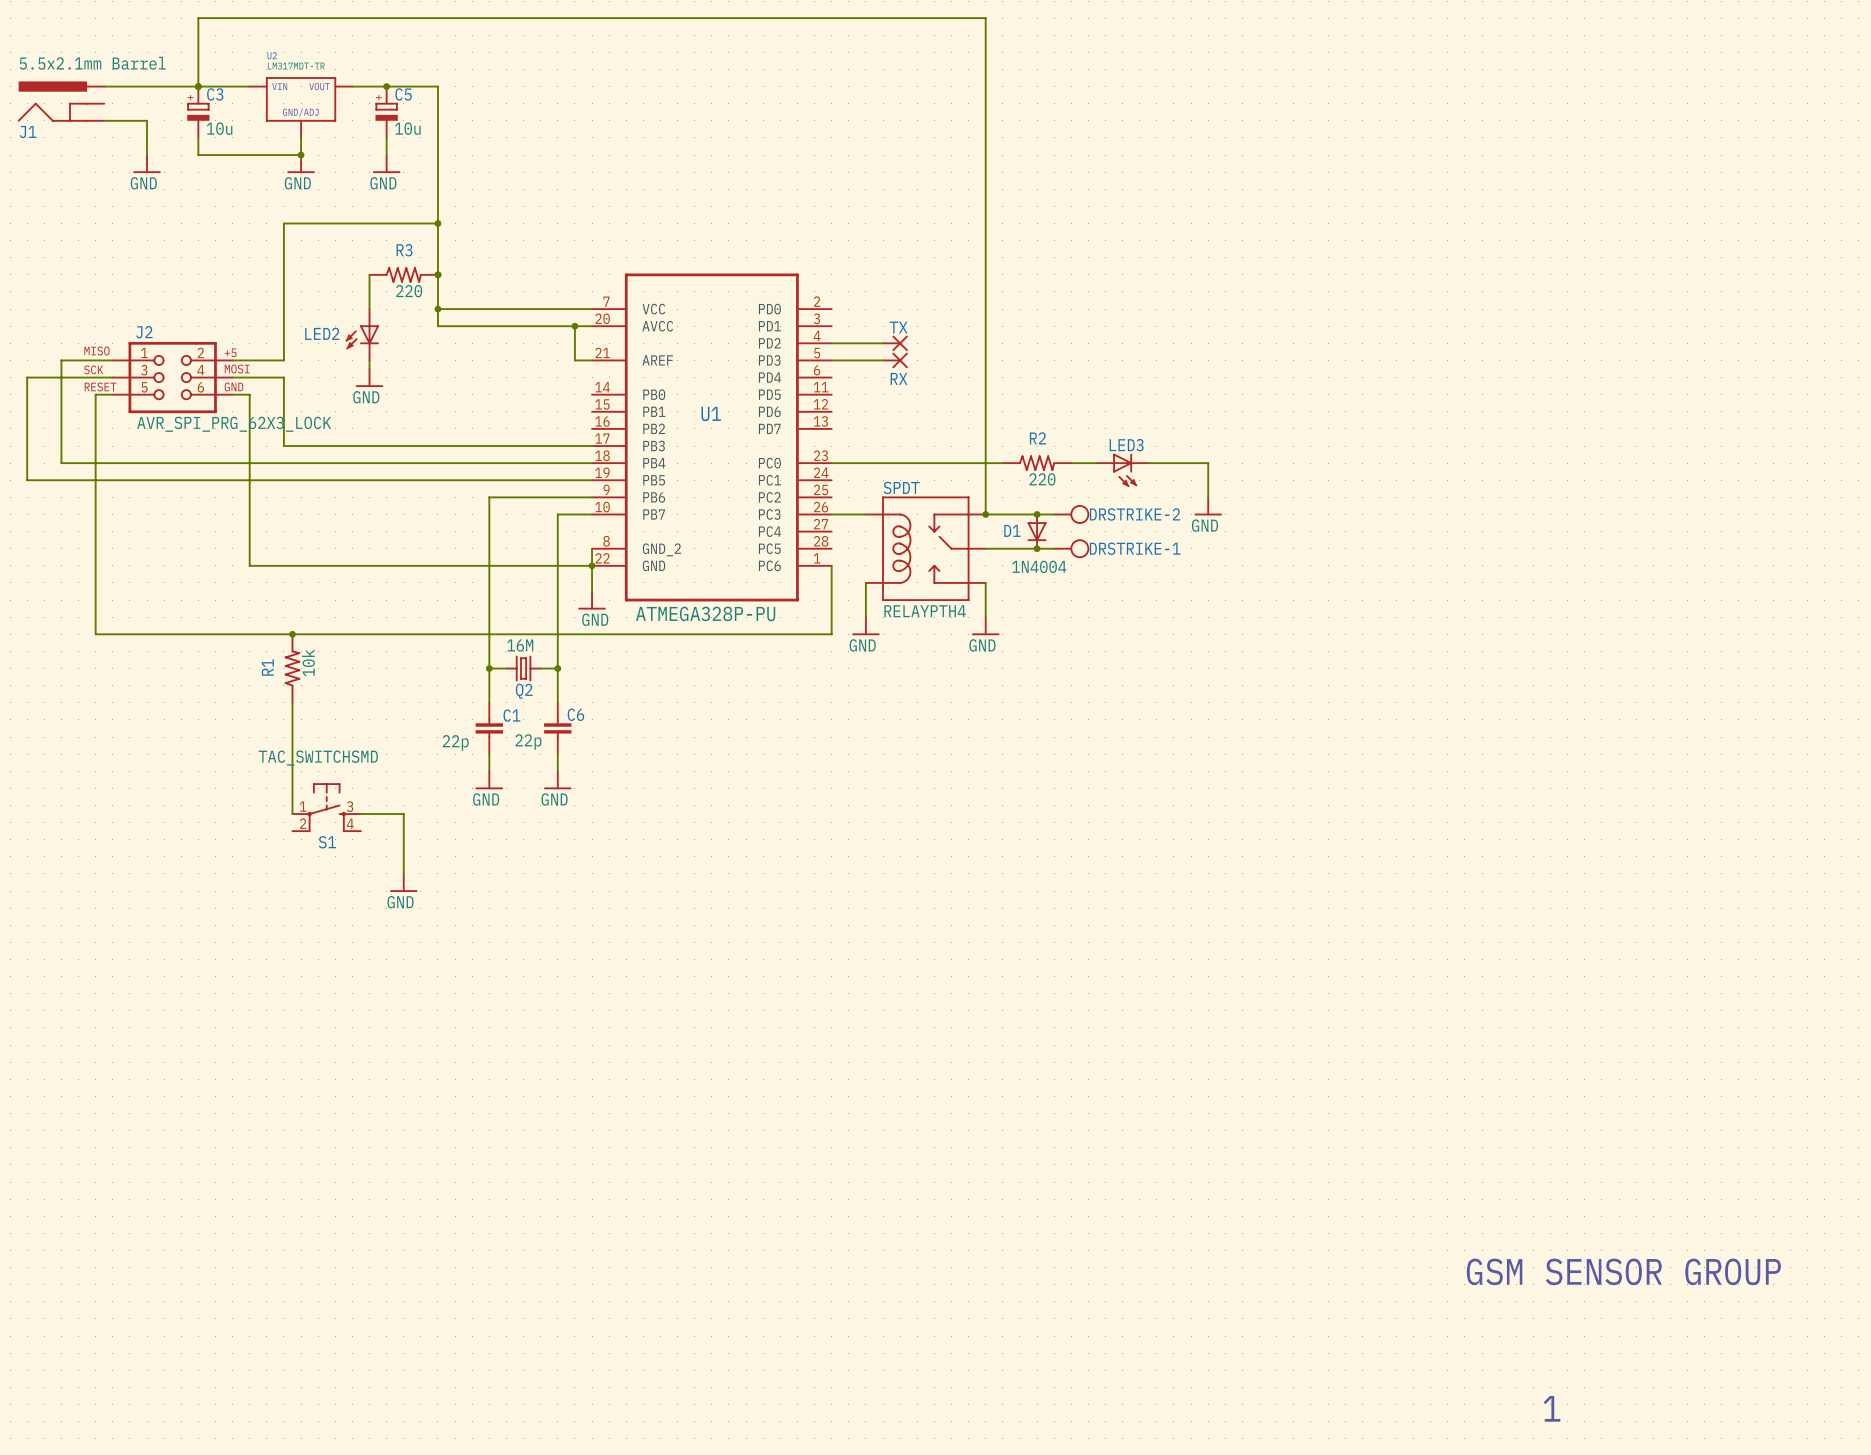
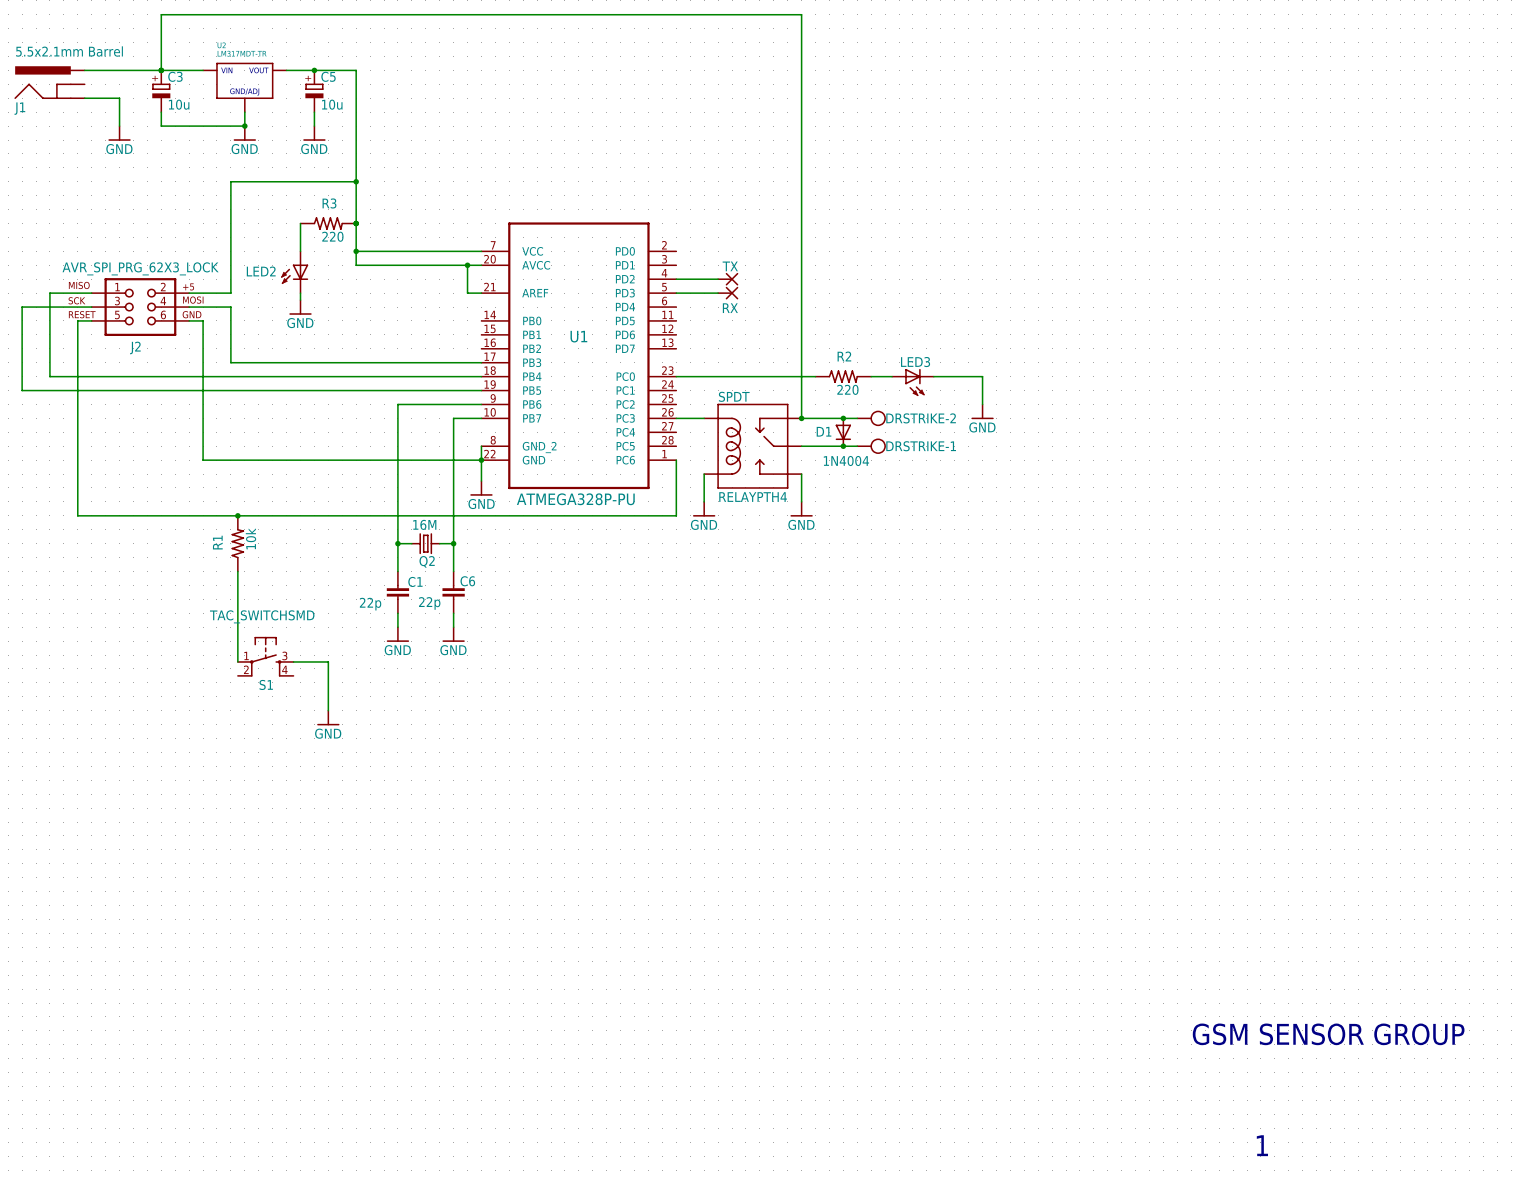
J2 name position: J2 (144, 332) -> J2 (135, 347)
J2 value position: AVR_SPI_PRG_62X3_LOCK (234, 424) -> AVR_SPI_PRG_62X3_LOCK (140, 268)

